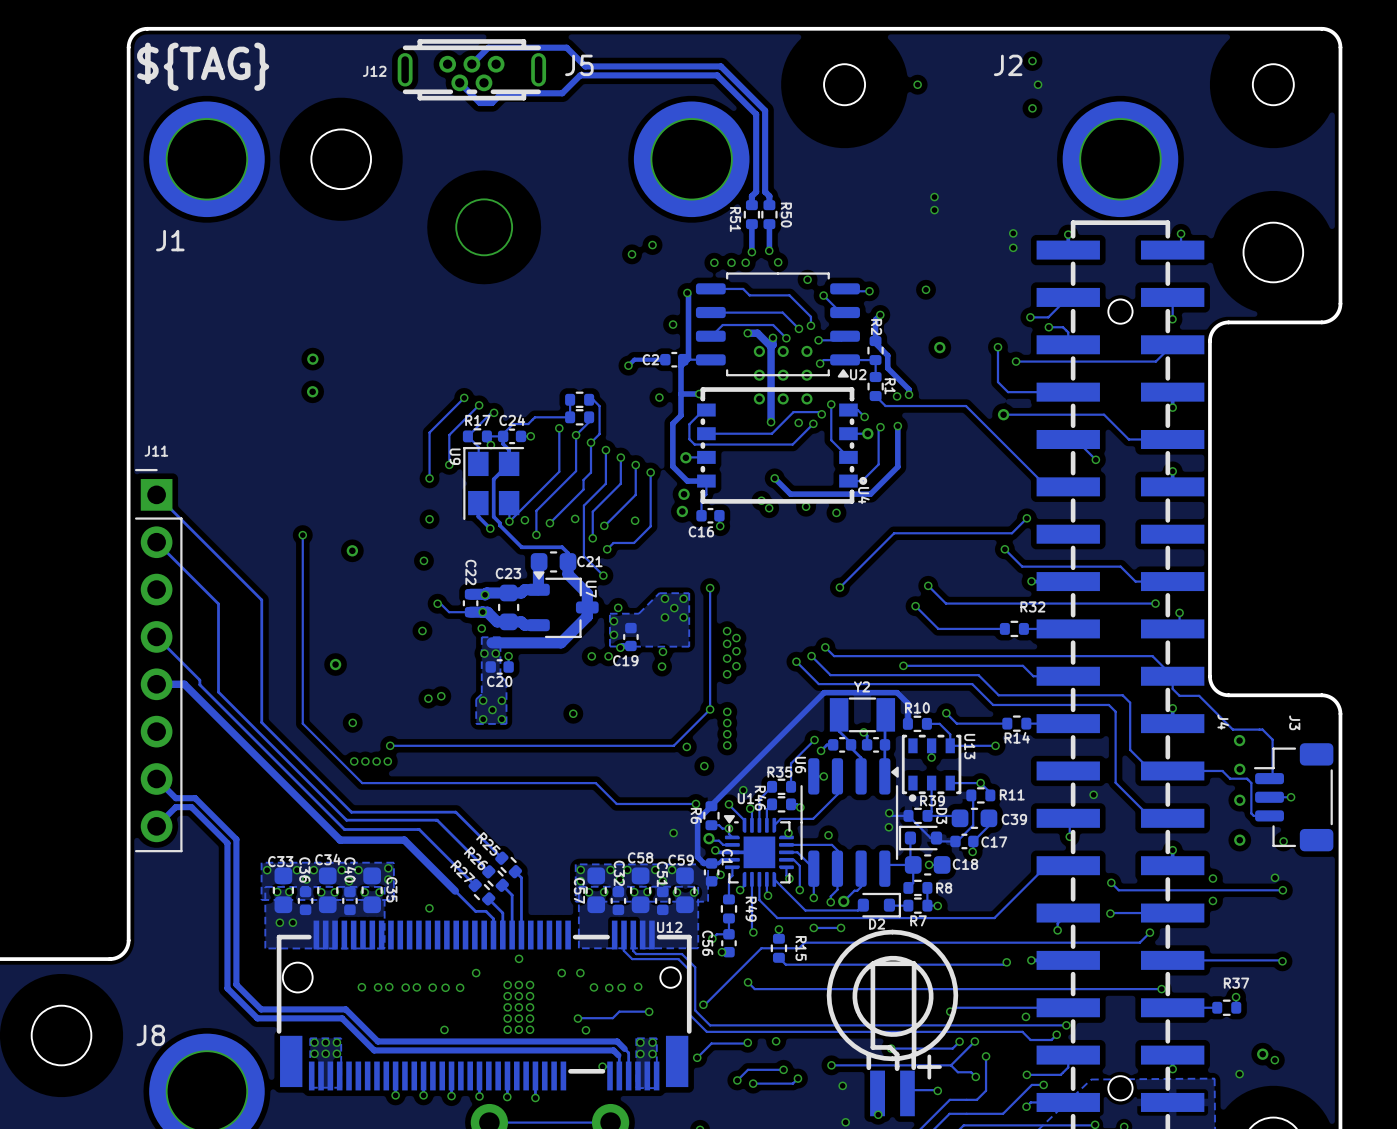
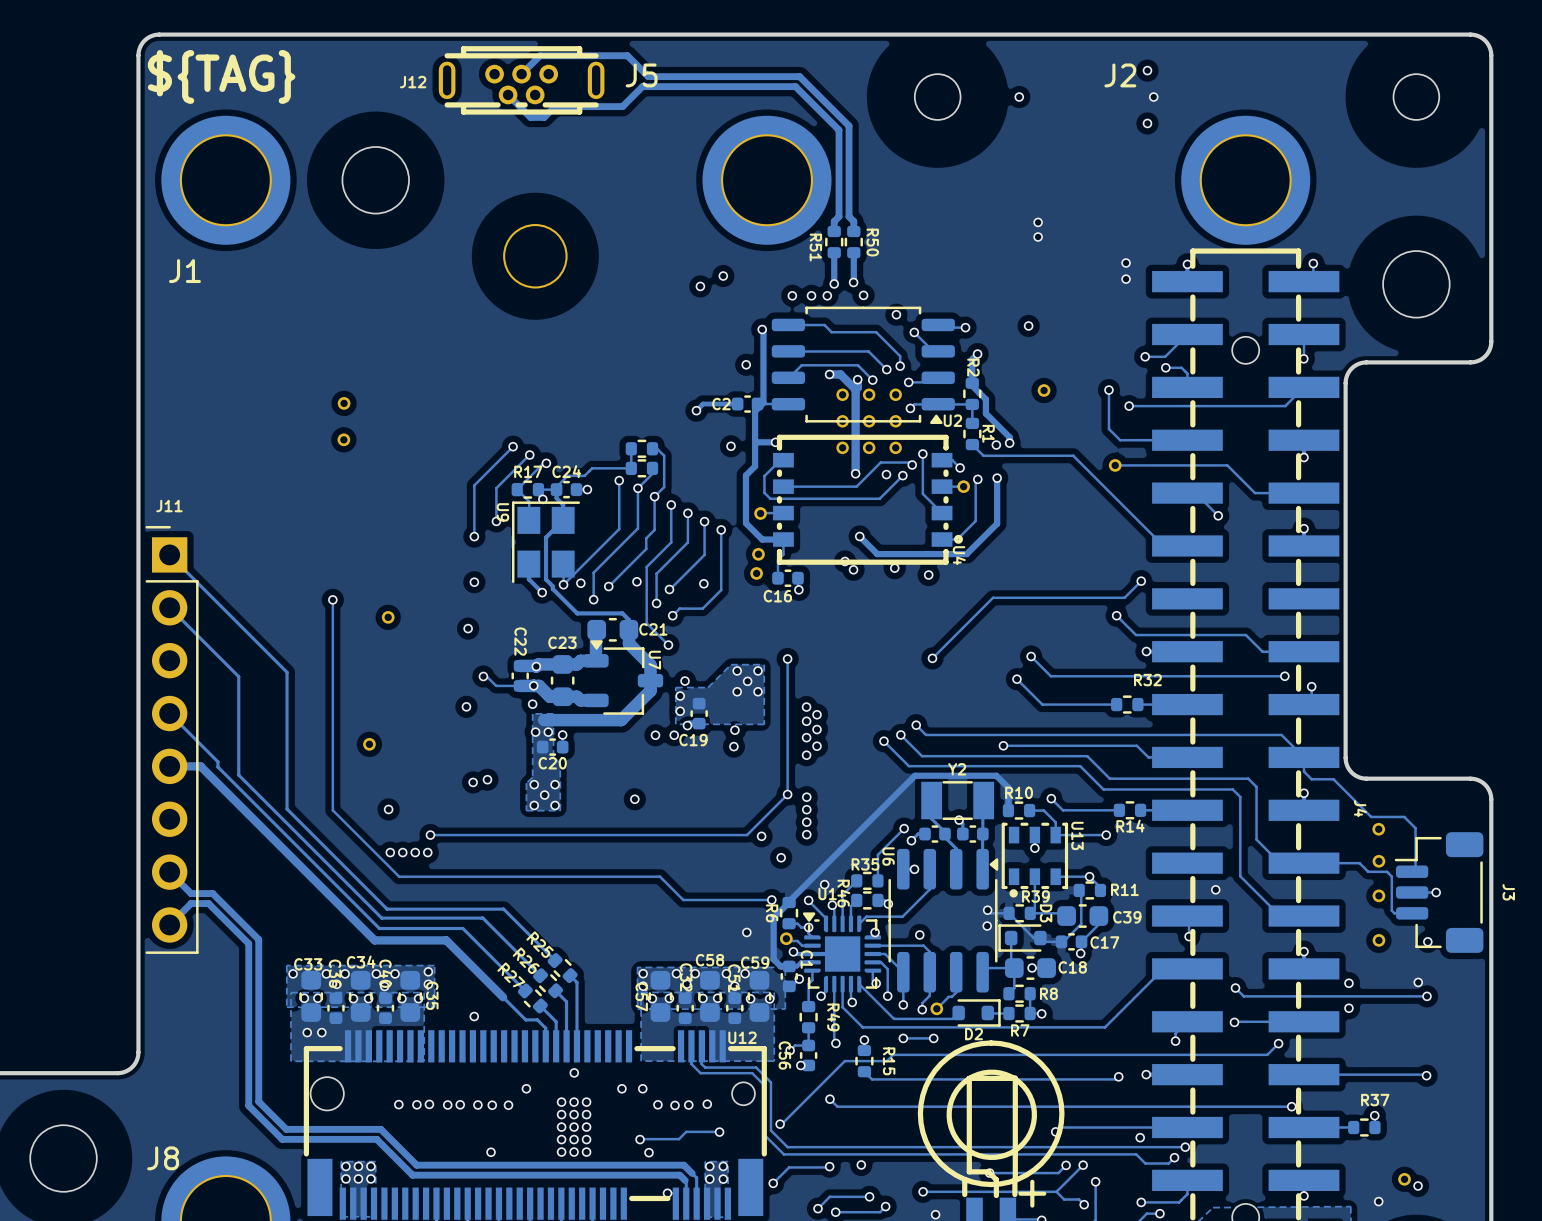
J3 name position: J3 (1294, 722) -> J3 (1508, 892)

